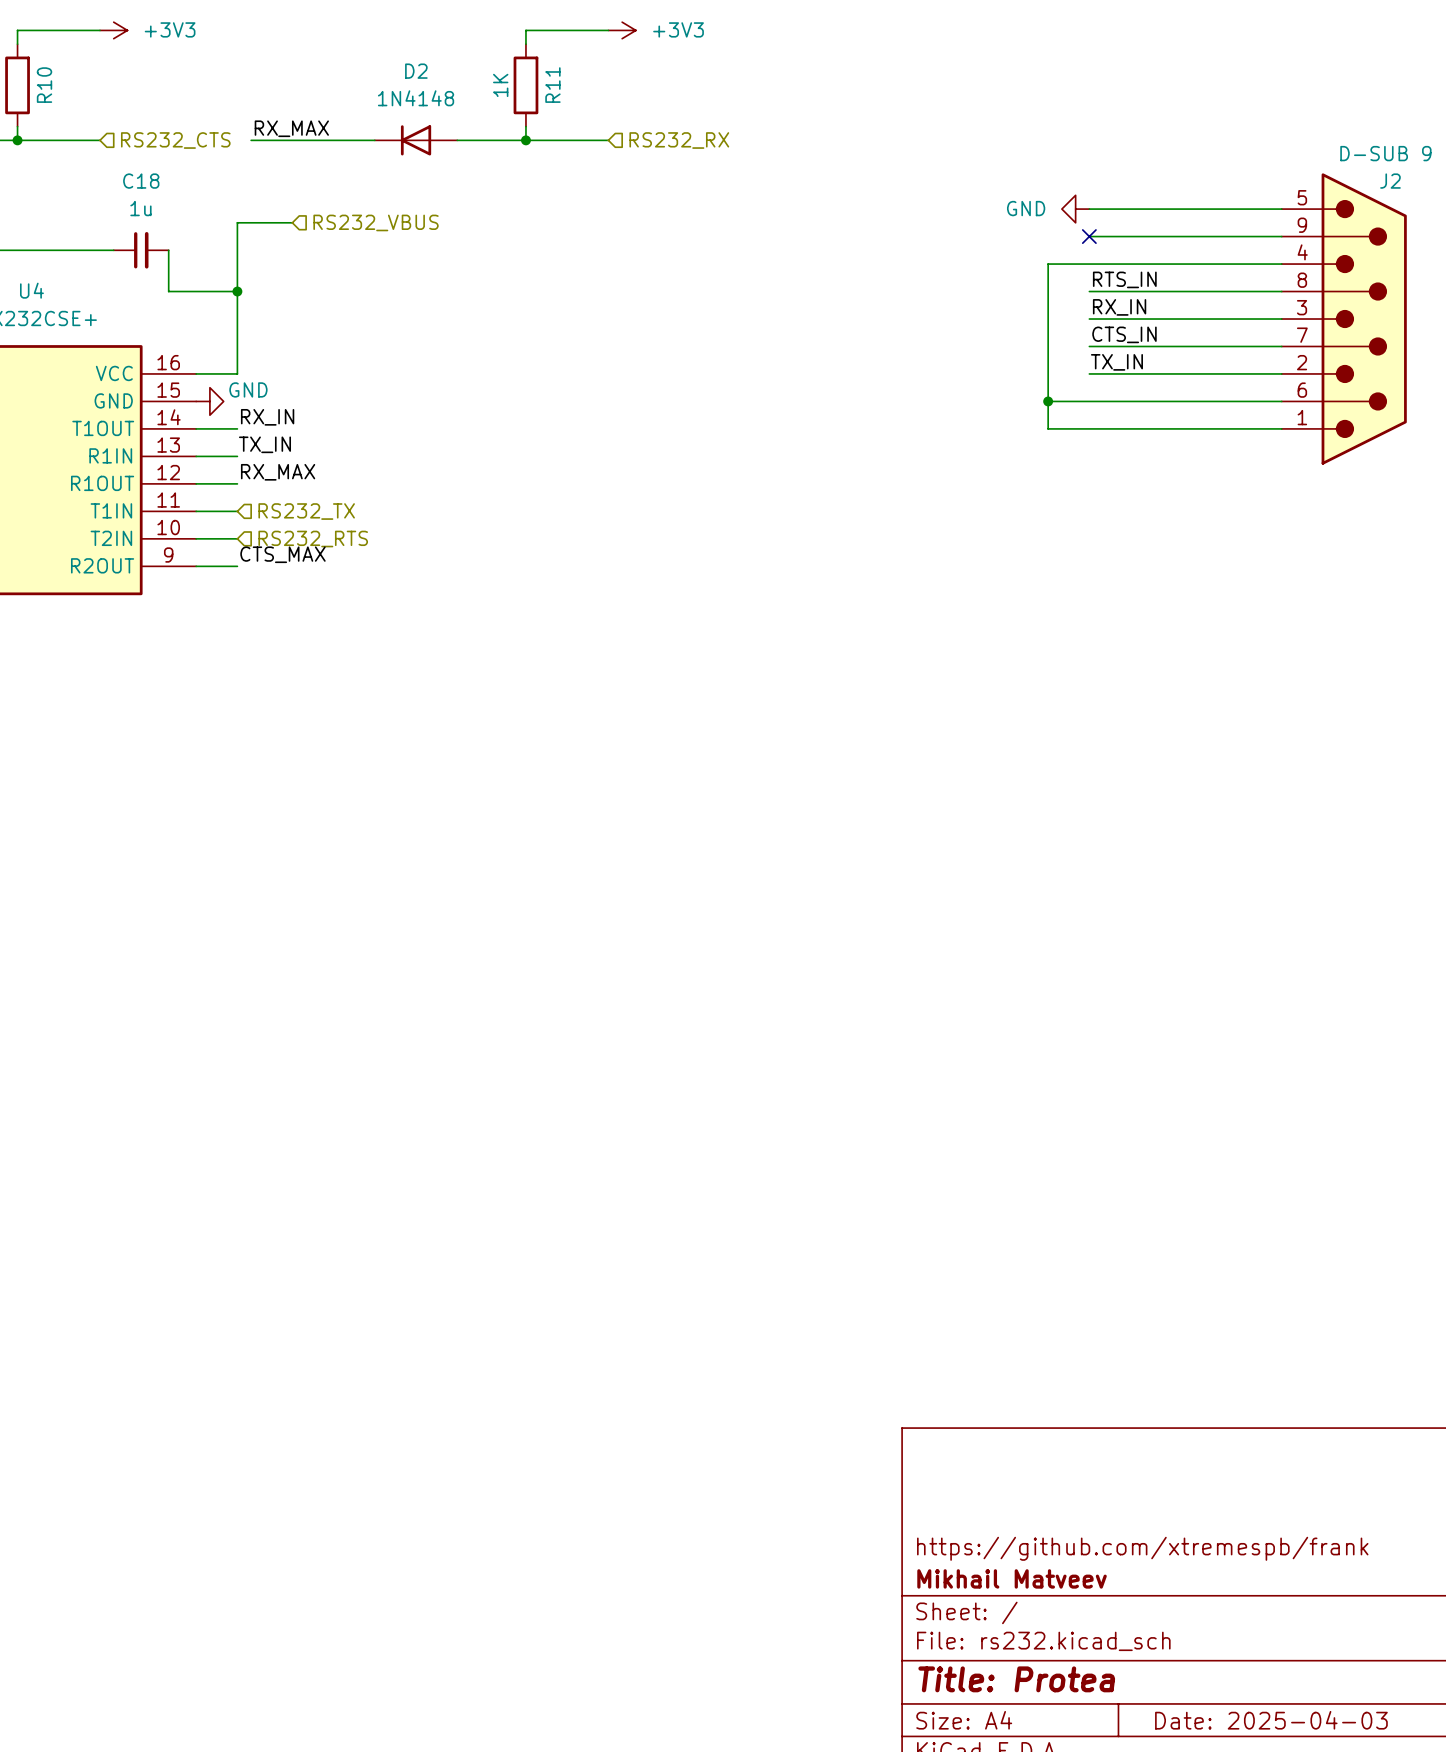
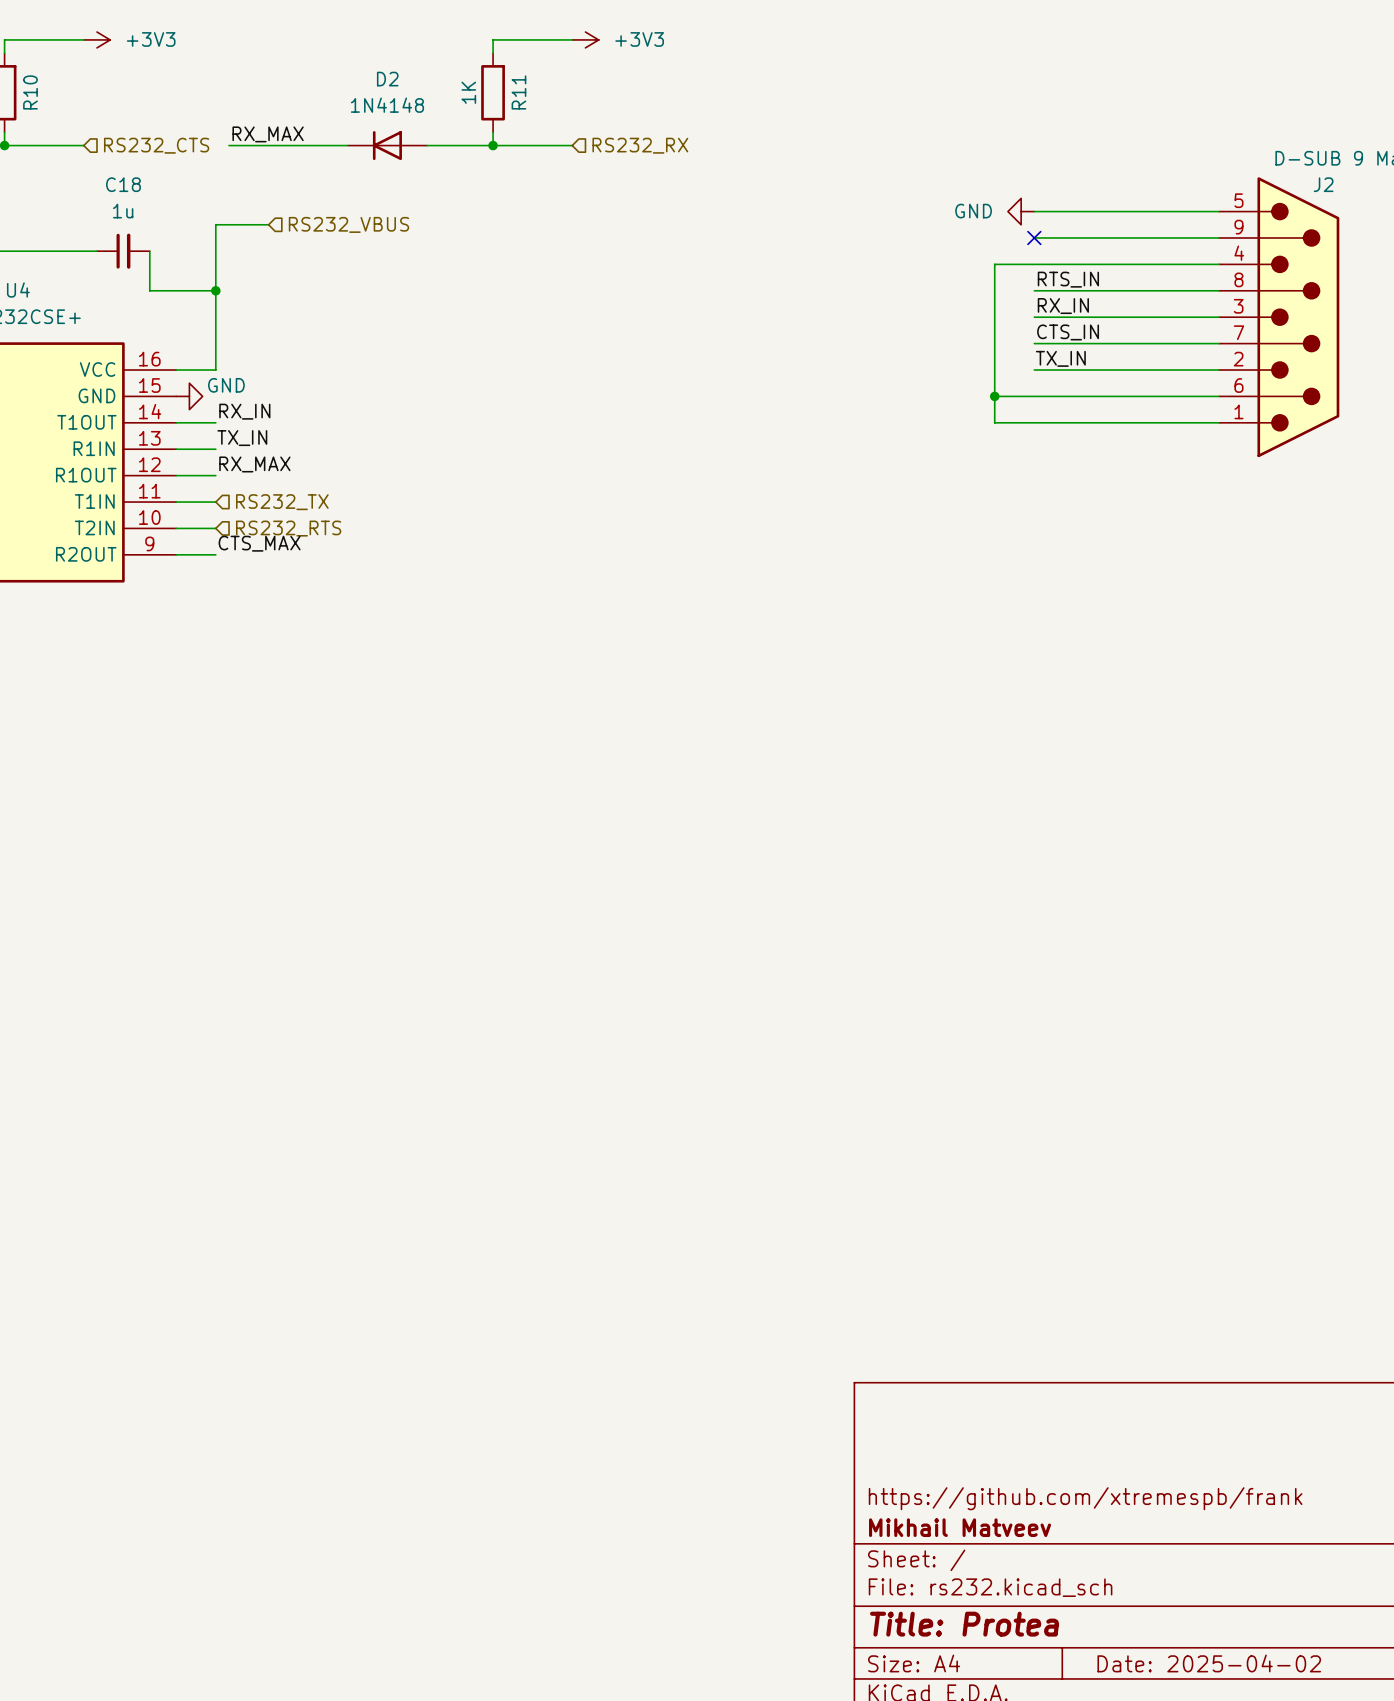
title block: Date: 2025-04-03 (1271, 1720) -> Date: 2025-04-02 (1209, 1663)

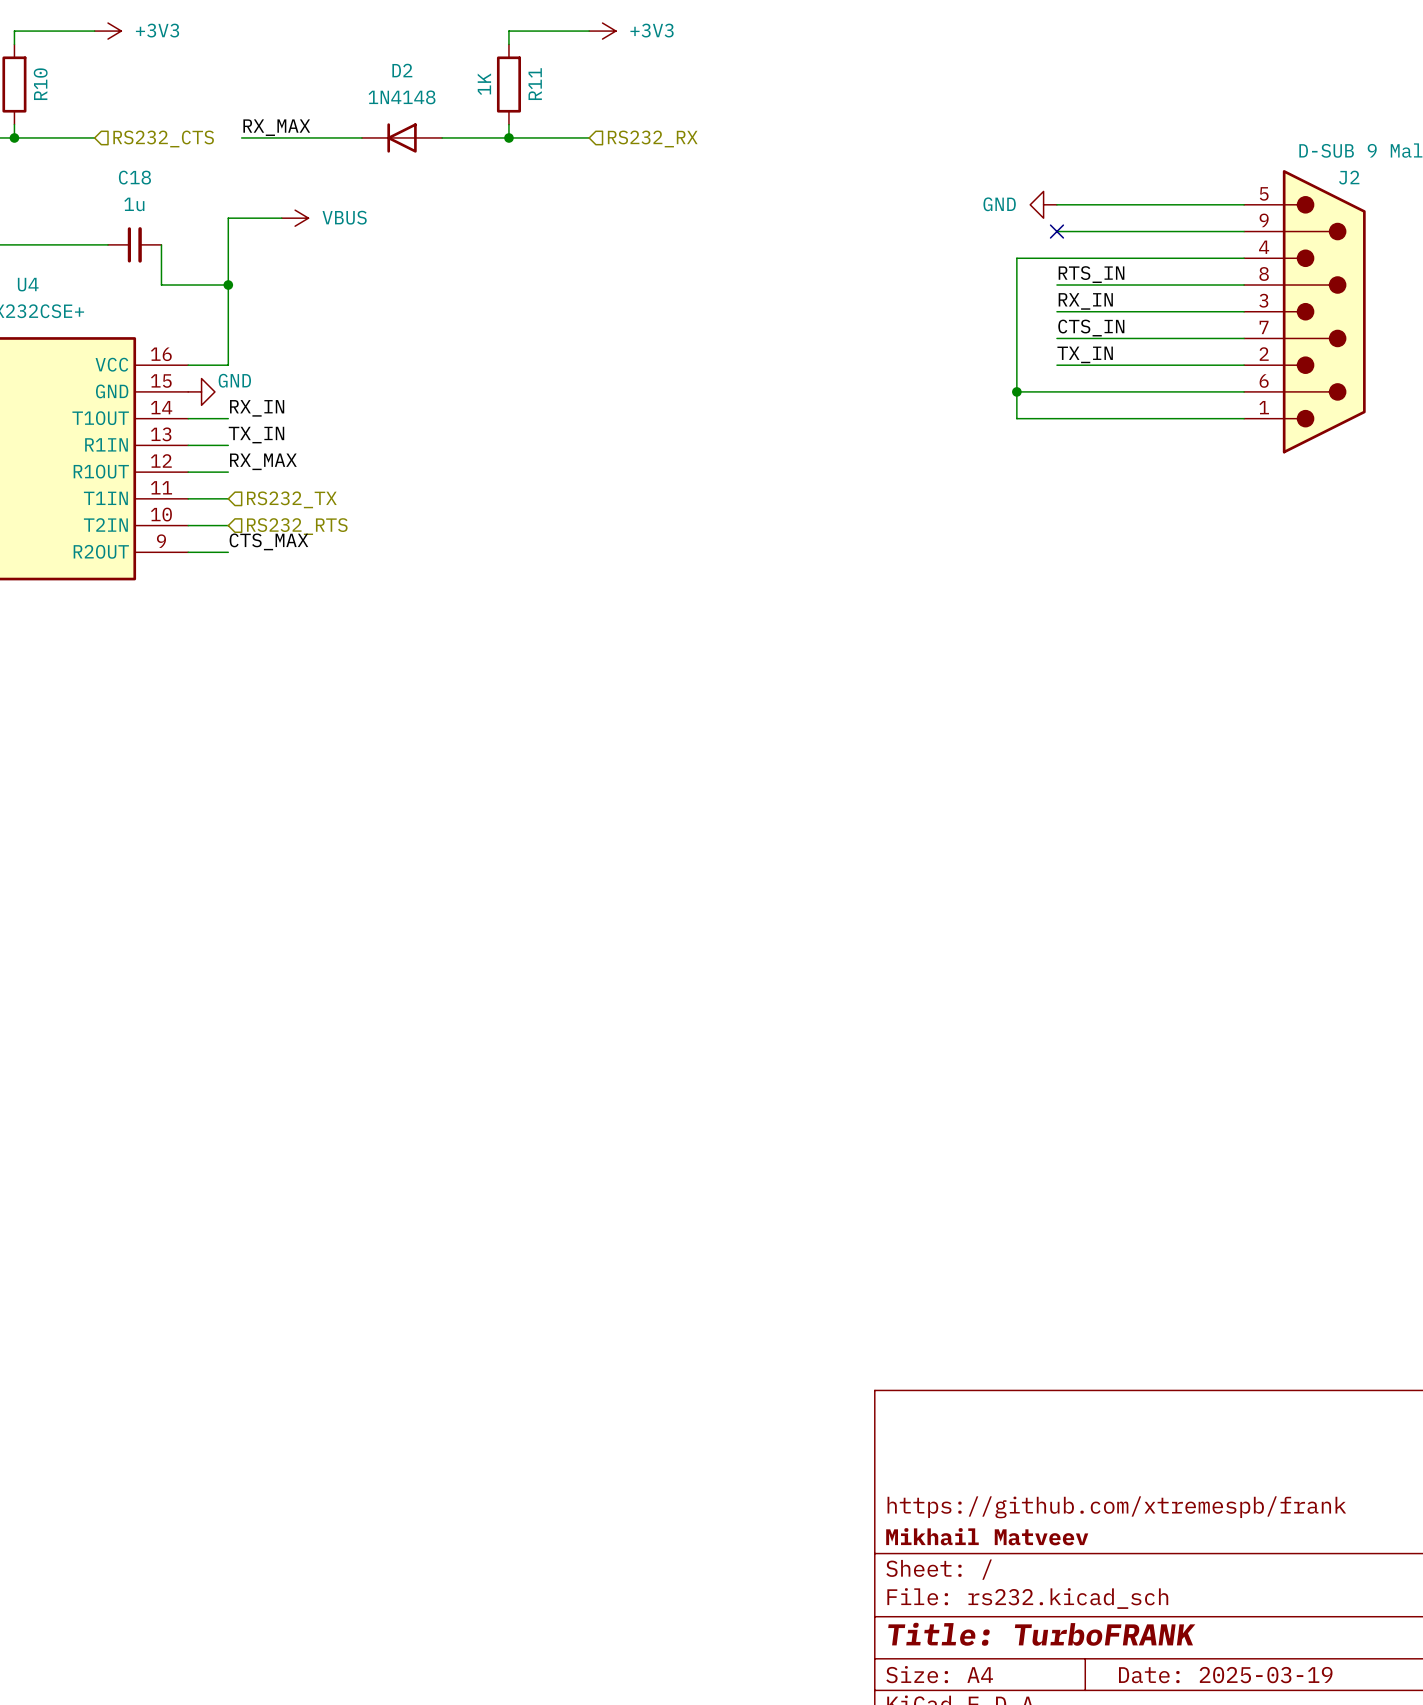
power symbol: none -> VBUS (295, 218)
hierarchical label: RS232_VBUS (348, 224) -> none
title block: Title: Protea (964, 1624) -> Title: TurboFRANK (1041, 1634)
title block: Date: 2025-04-02 (1209, 1663) -> Date: 2025-03-19 (1225, 1675)

